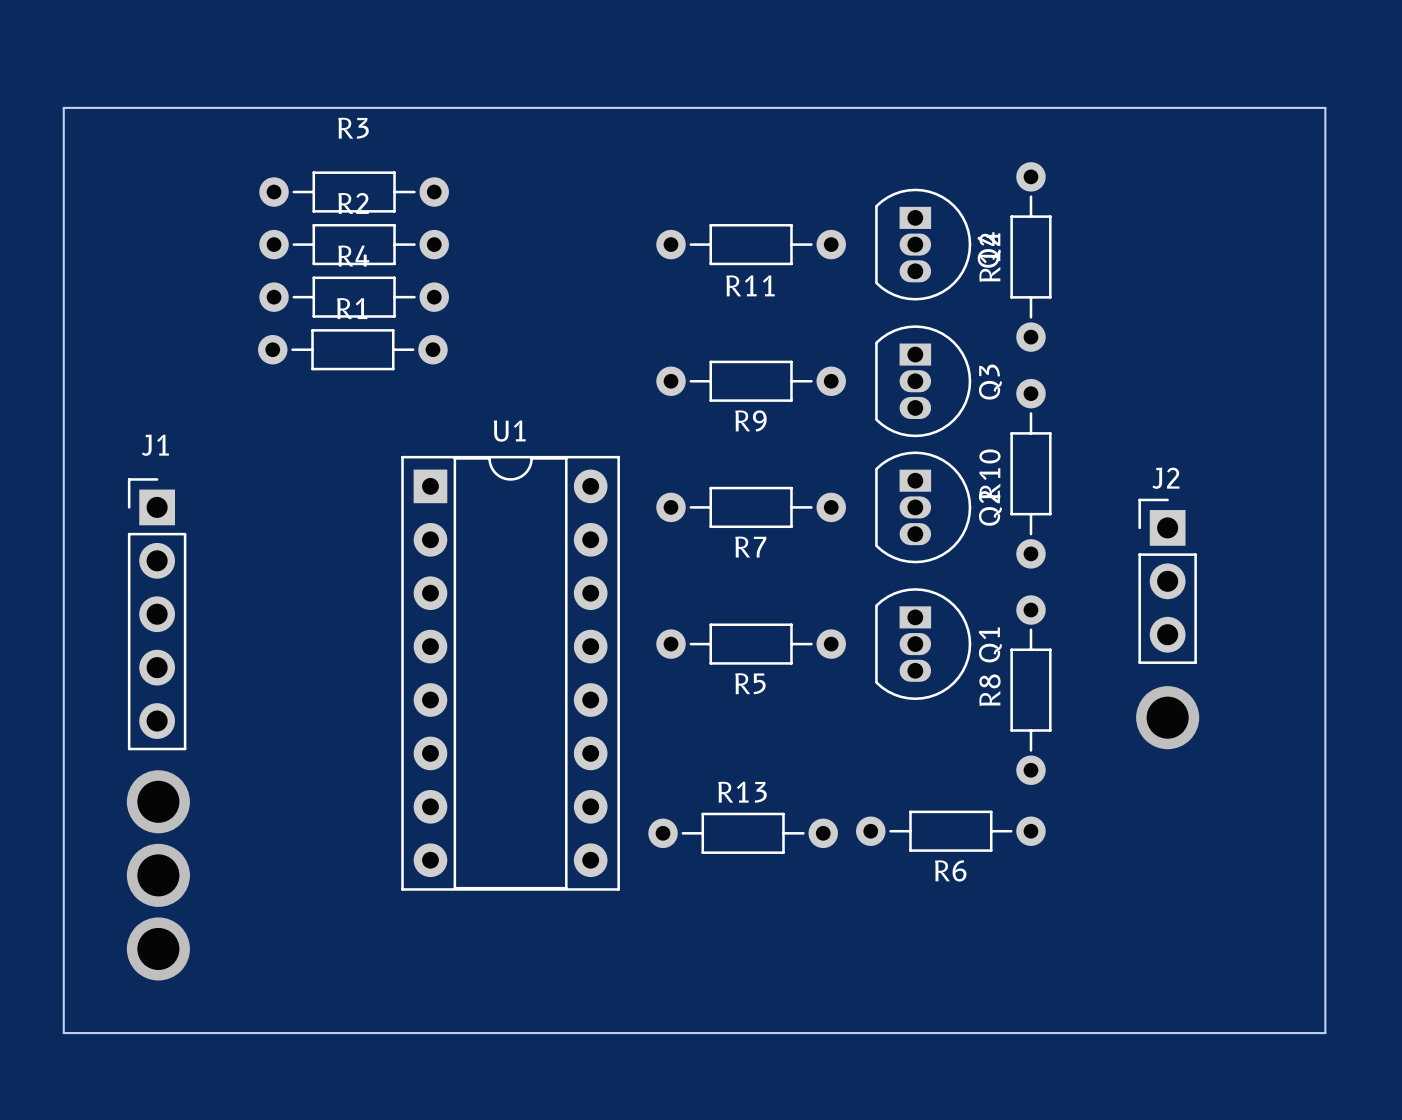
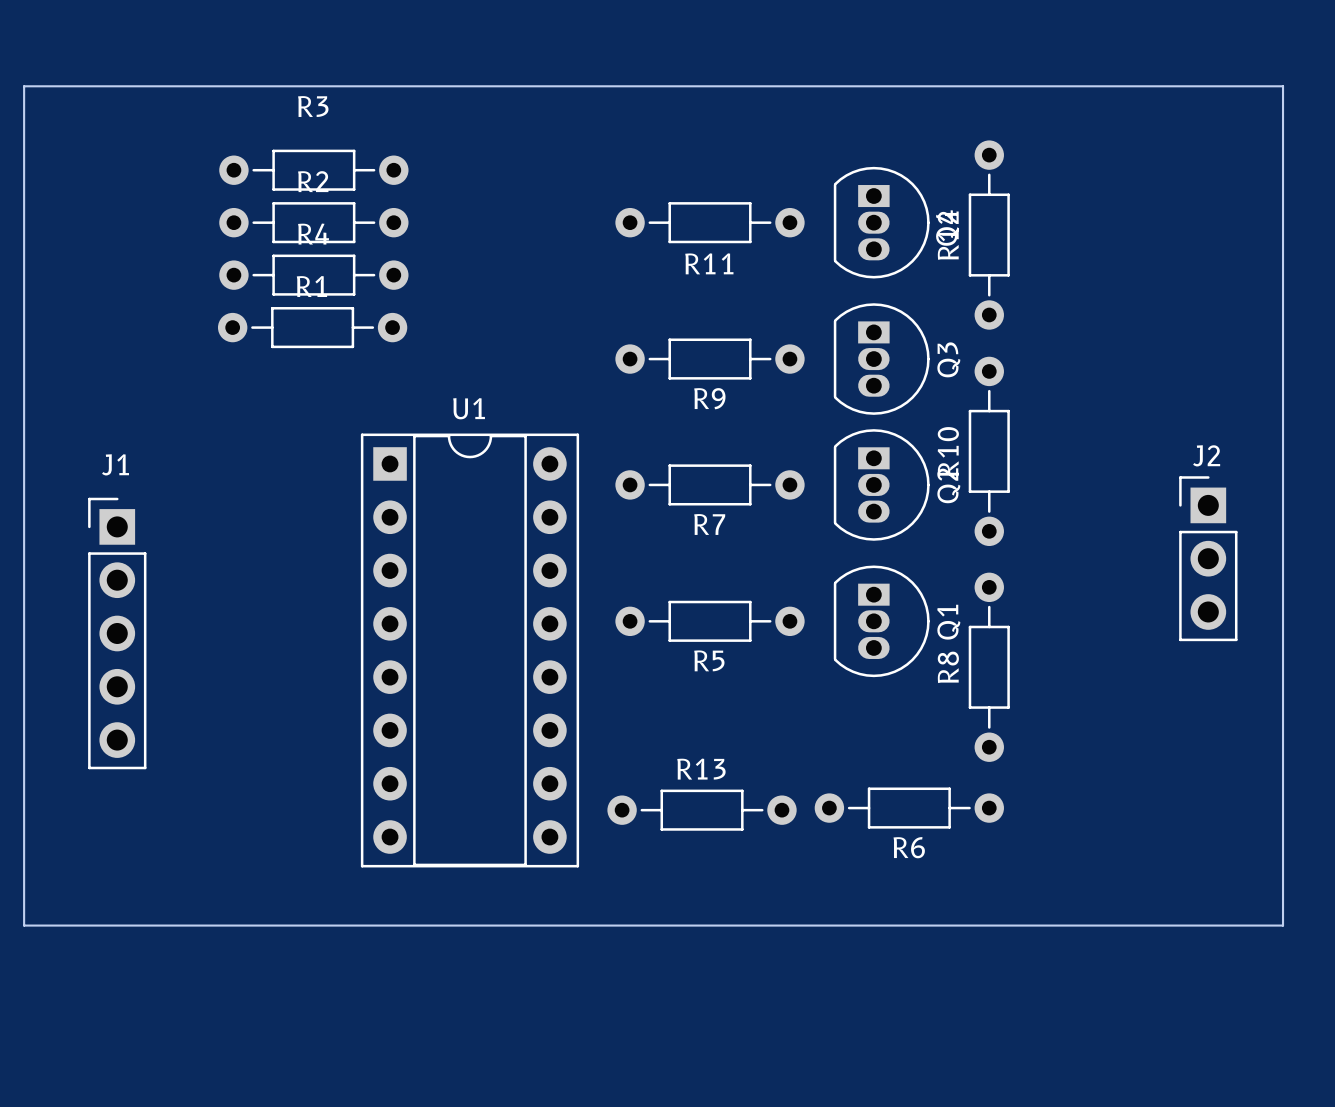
J2 position: (1167, 581) -> (1208, 558)
J1 position: (157, 614) -> (117, 633)
via: (1167, 717) -> none
via: (158, 801) -> none
via: (158, 875) -> none
board edge: (63, 948) (63, 1033) (1325, 1033) (1325, 948) -> (24, 925) (1283, 925)
via: (158, 948) -> none

